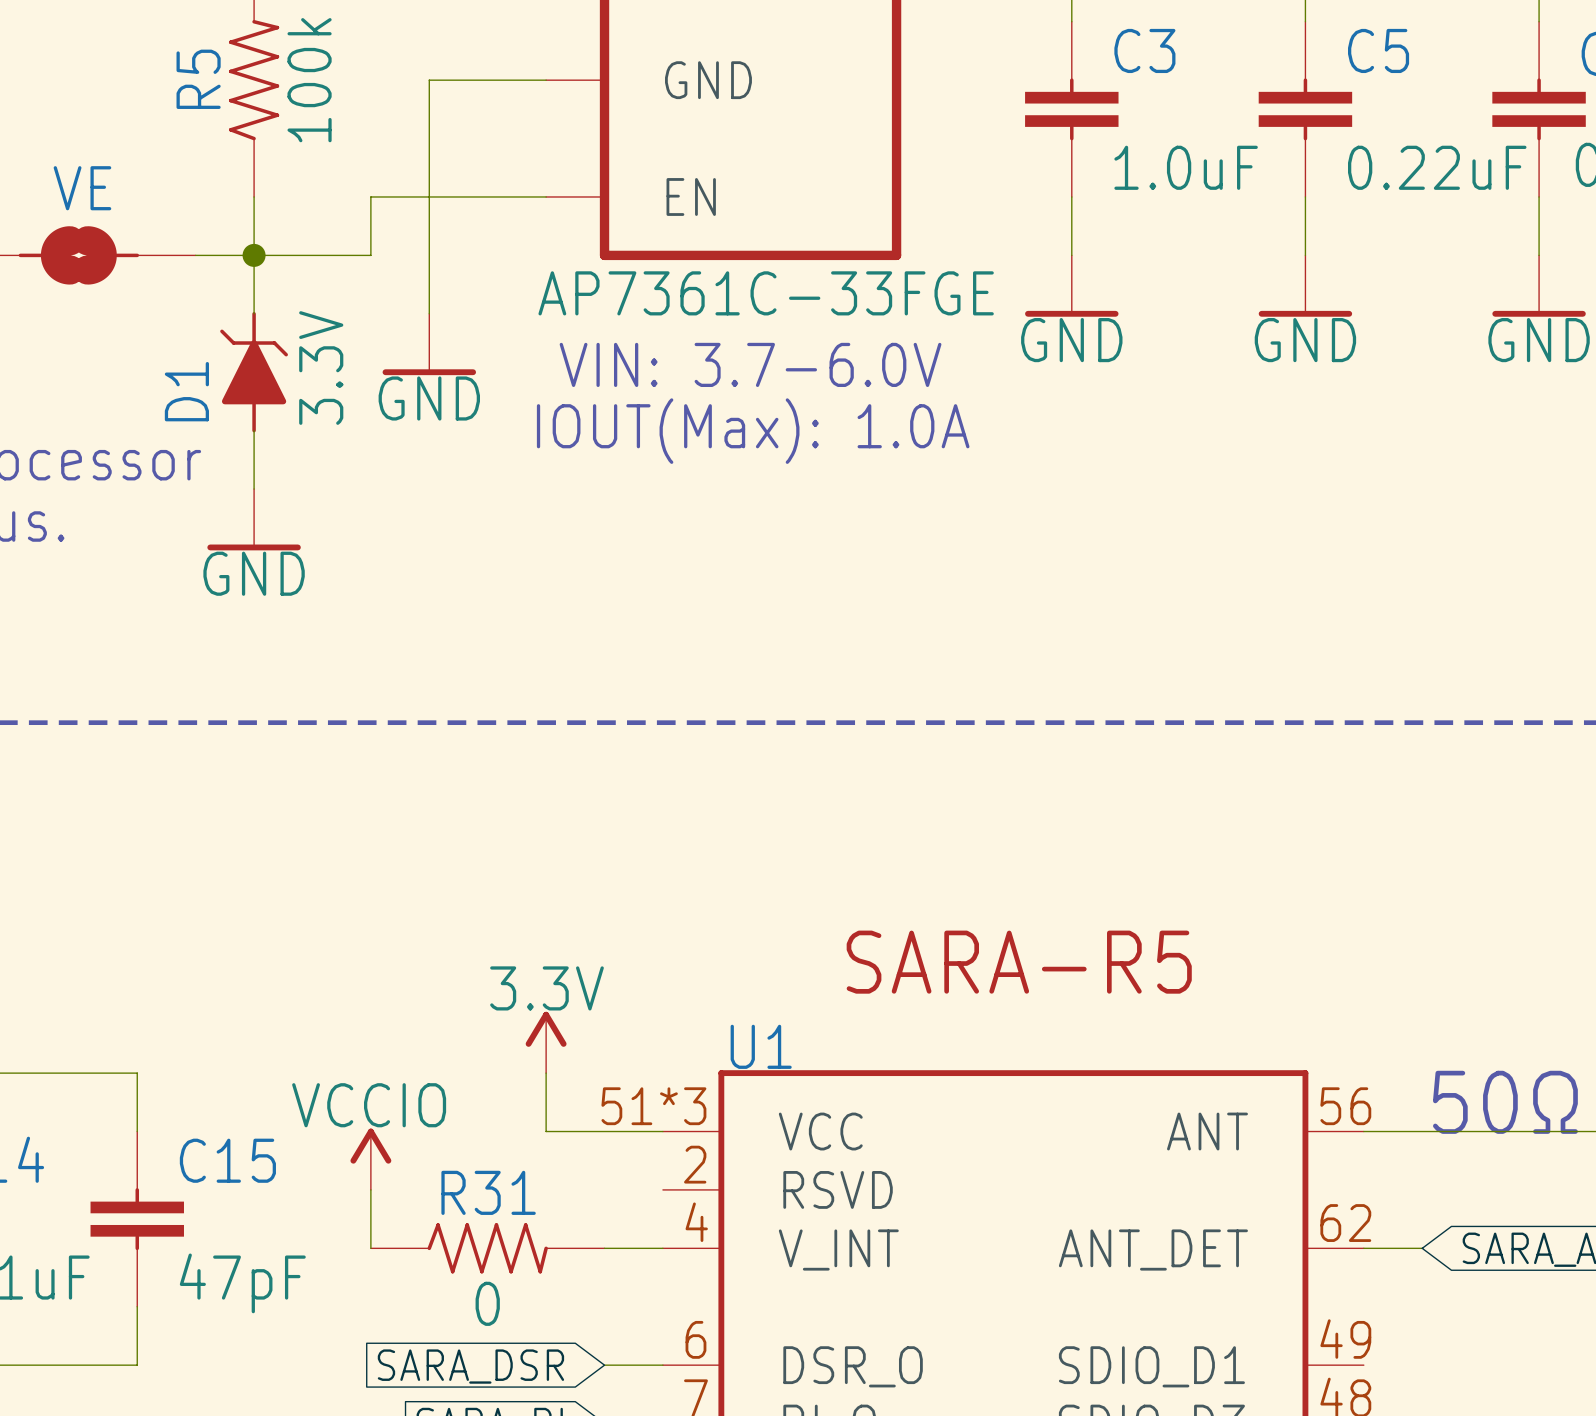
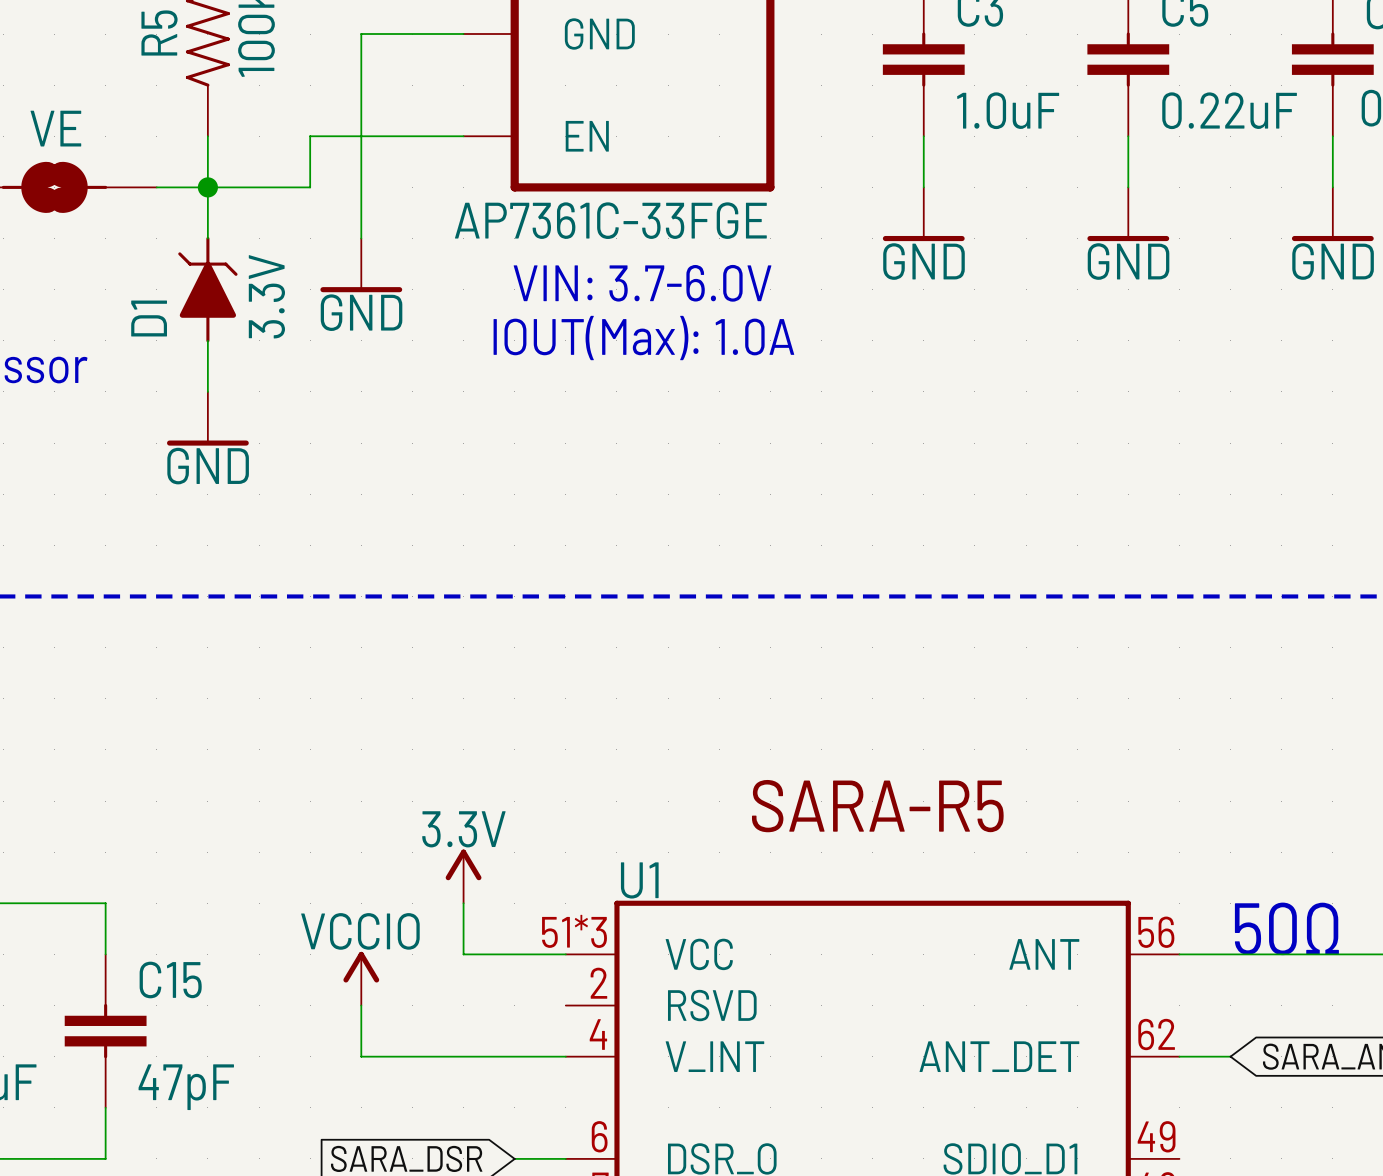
power symbol position: VCCIO (370, 1159) -> VCCIO (361, 978)
wire: (370, 1189) (370, 1248) -> none
wire: none -> (361, 1005) (361, 1056) (514, 1056)
R31: 0 (487, 1248) -> none

